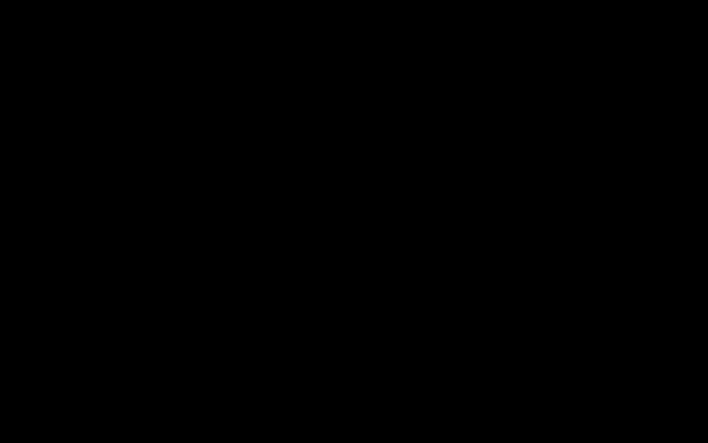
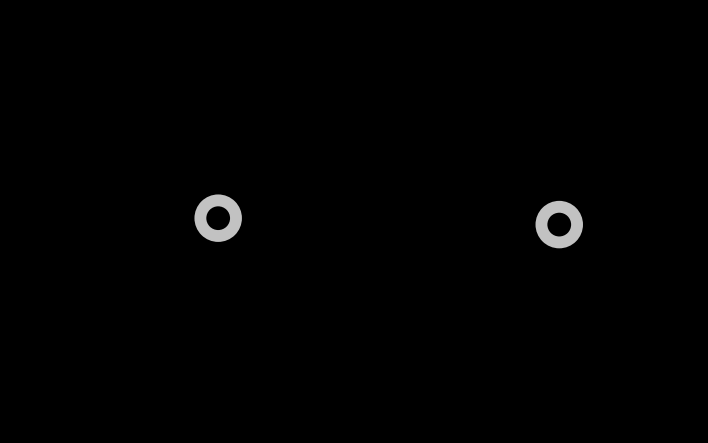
via: none -> (218, 218)
via: none -> (559, 224)

